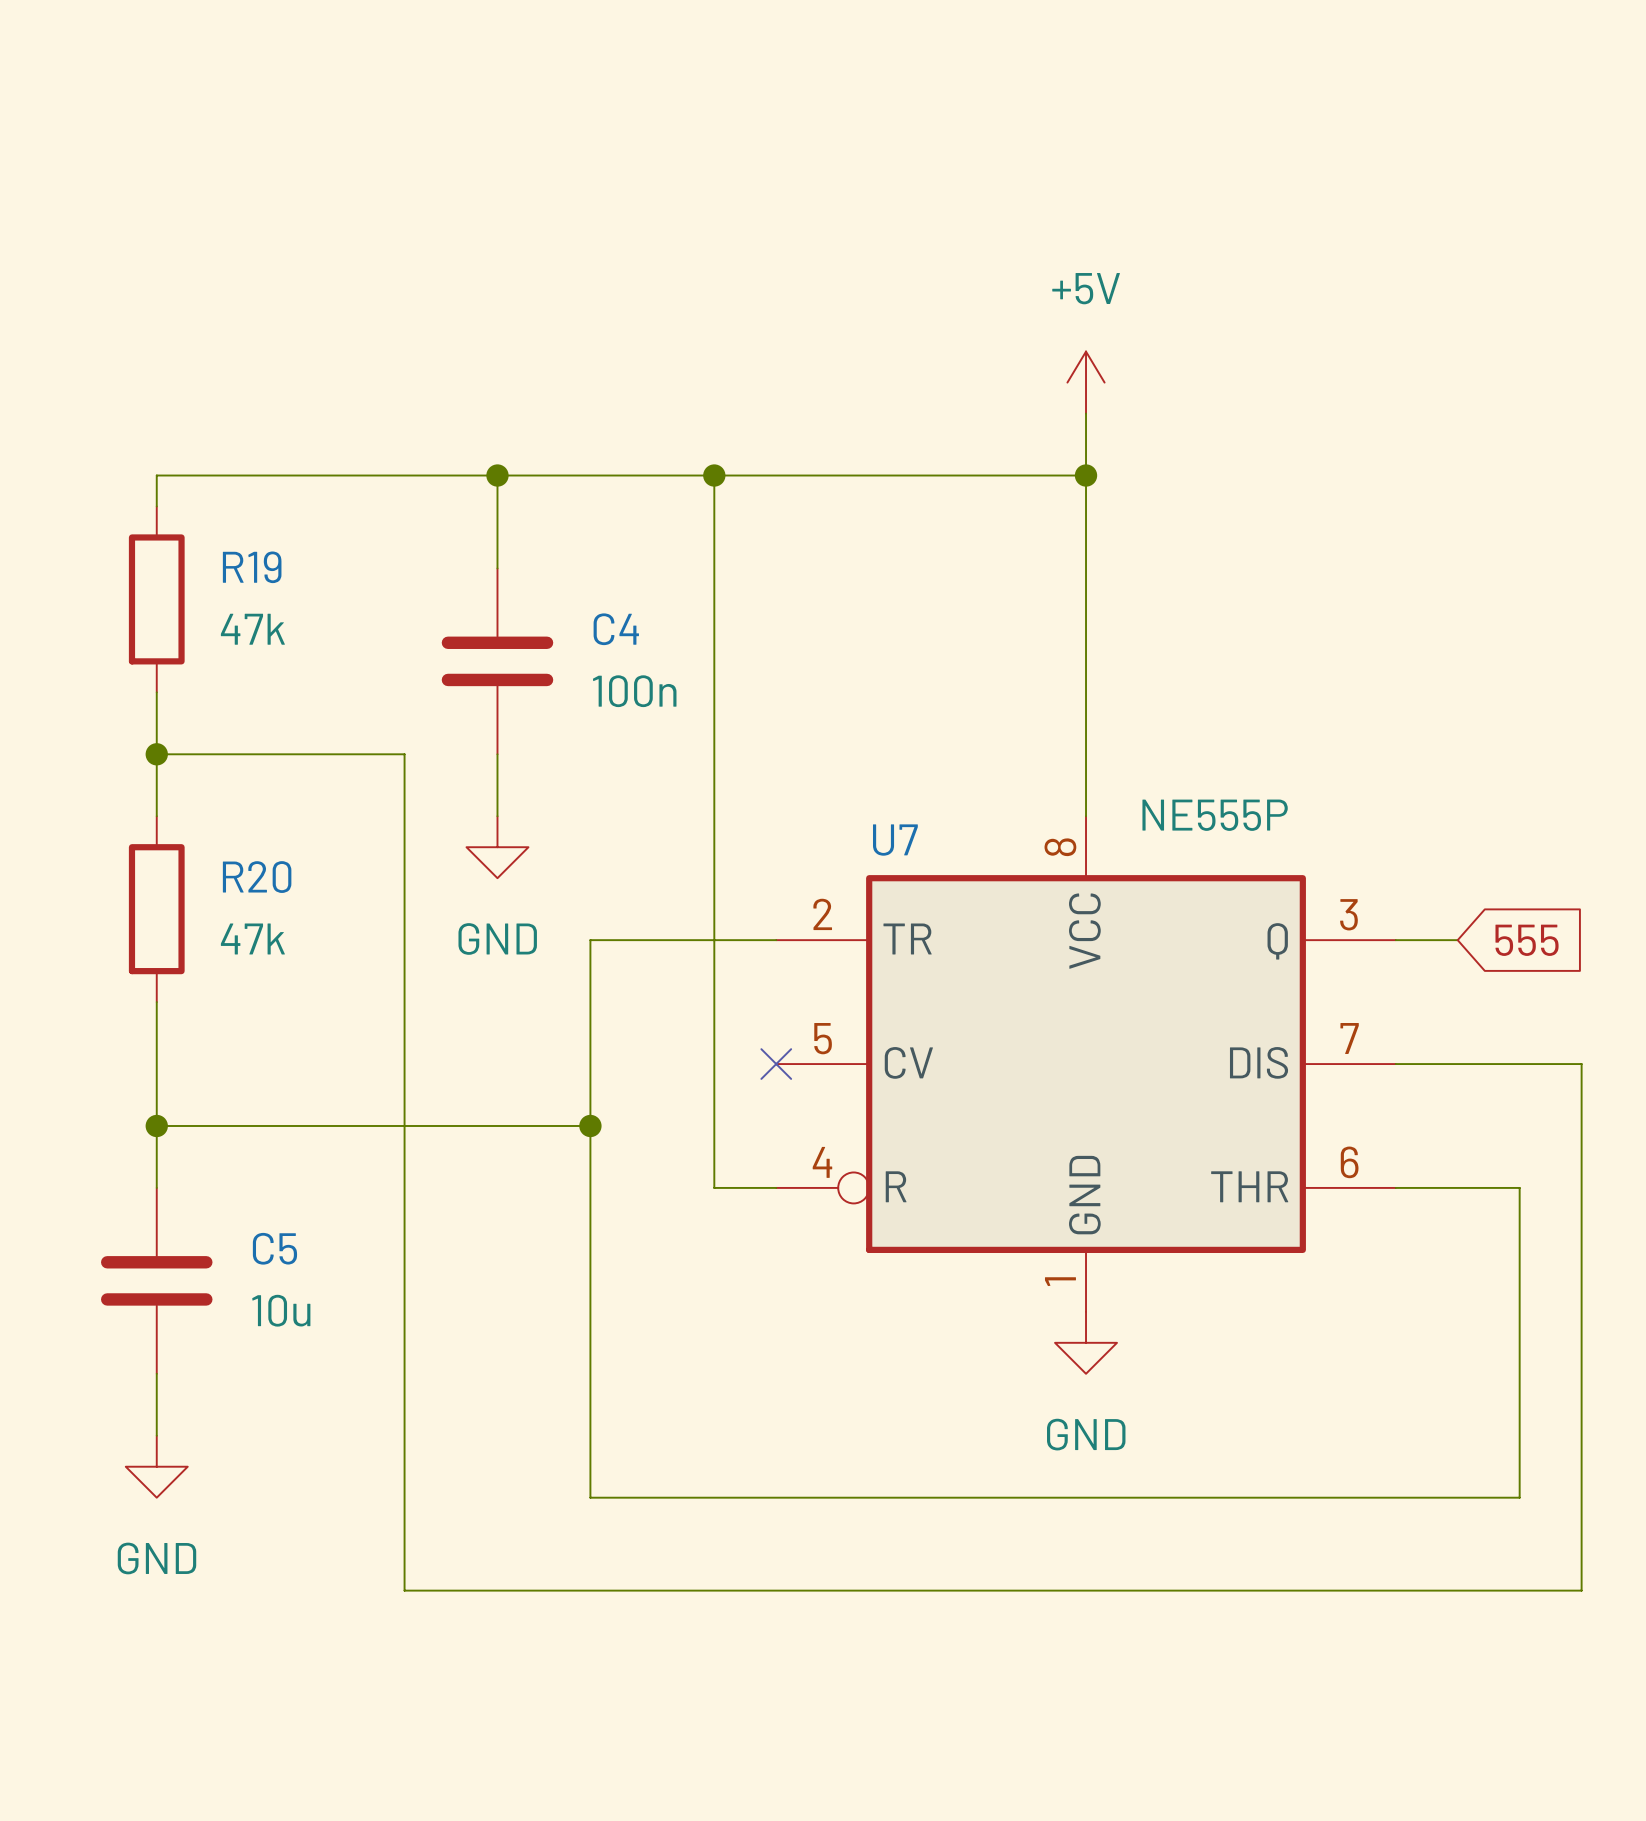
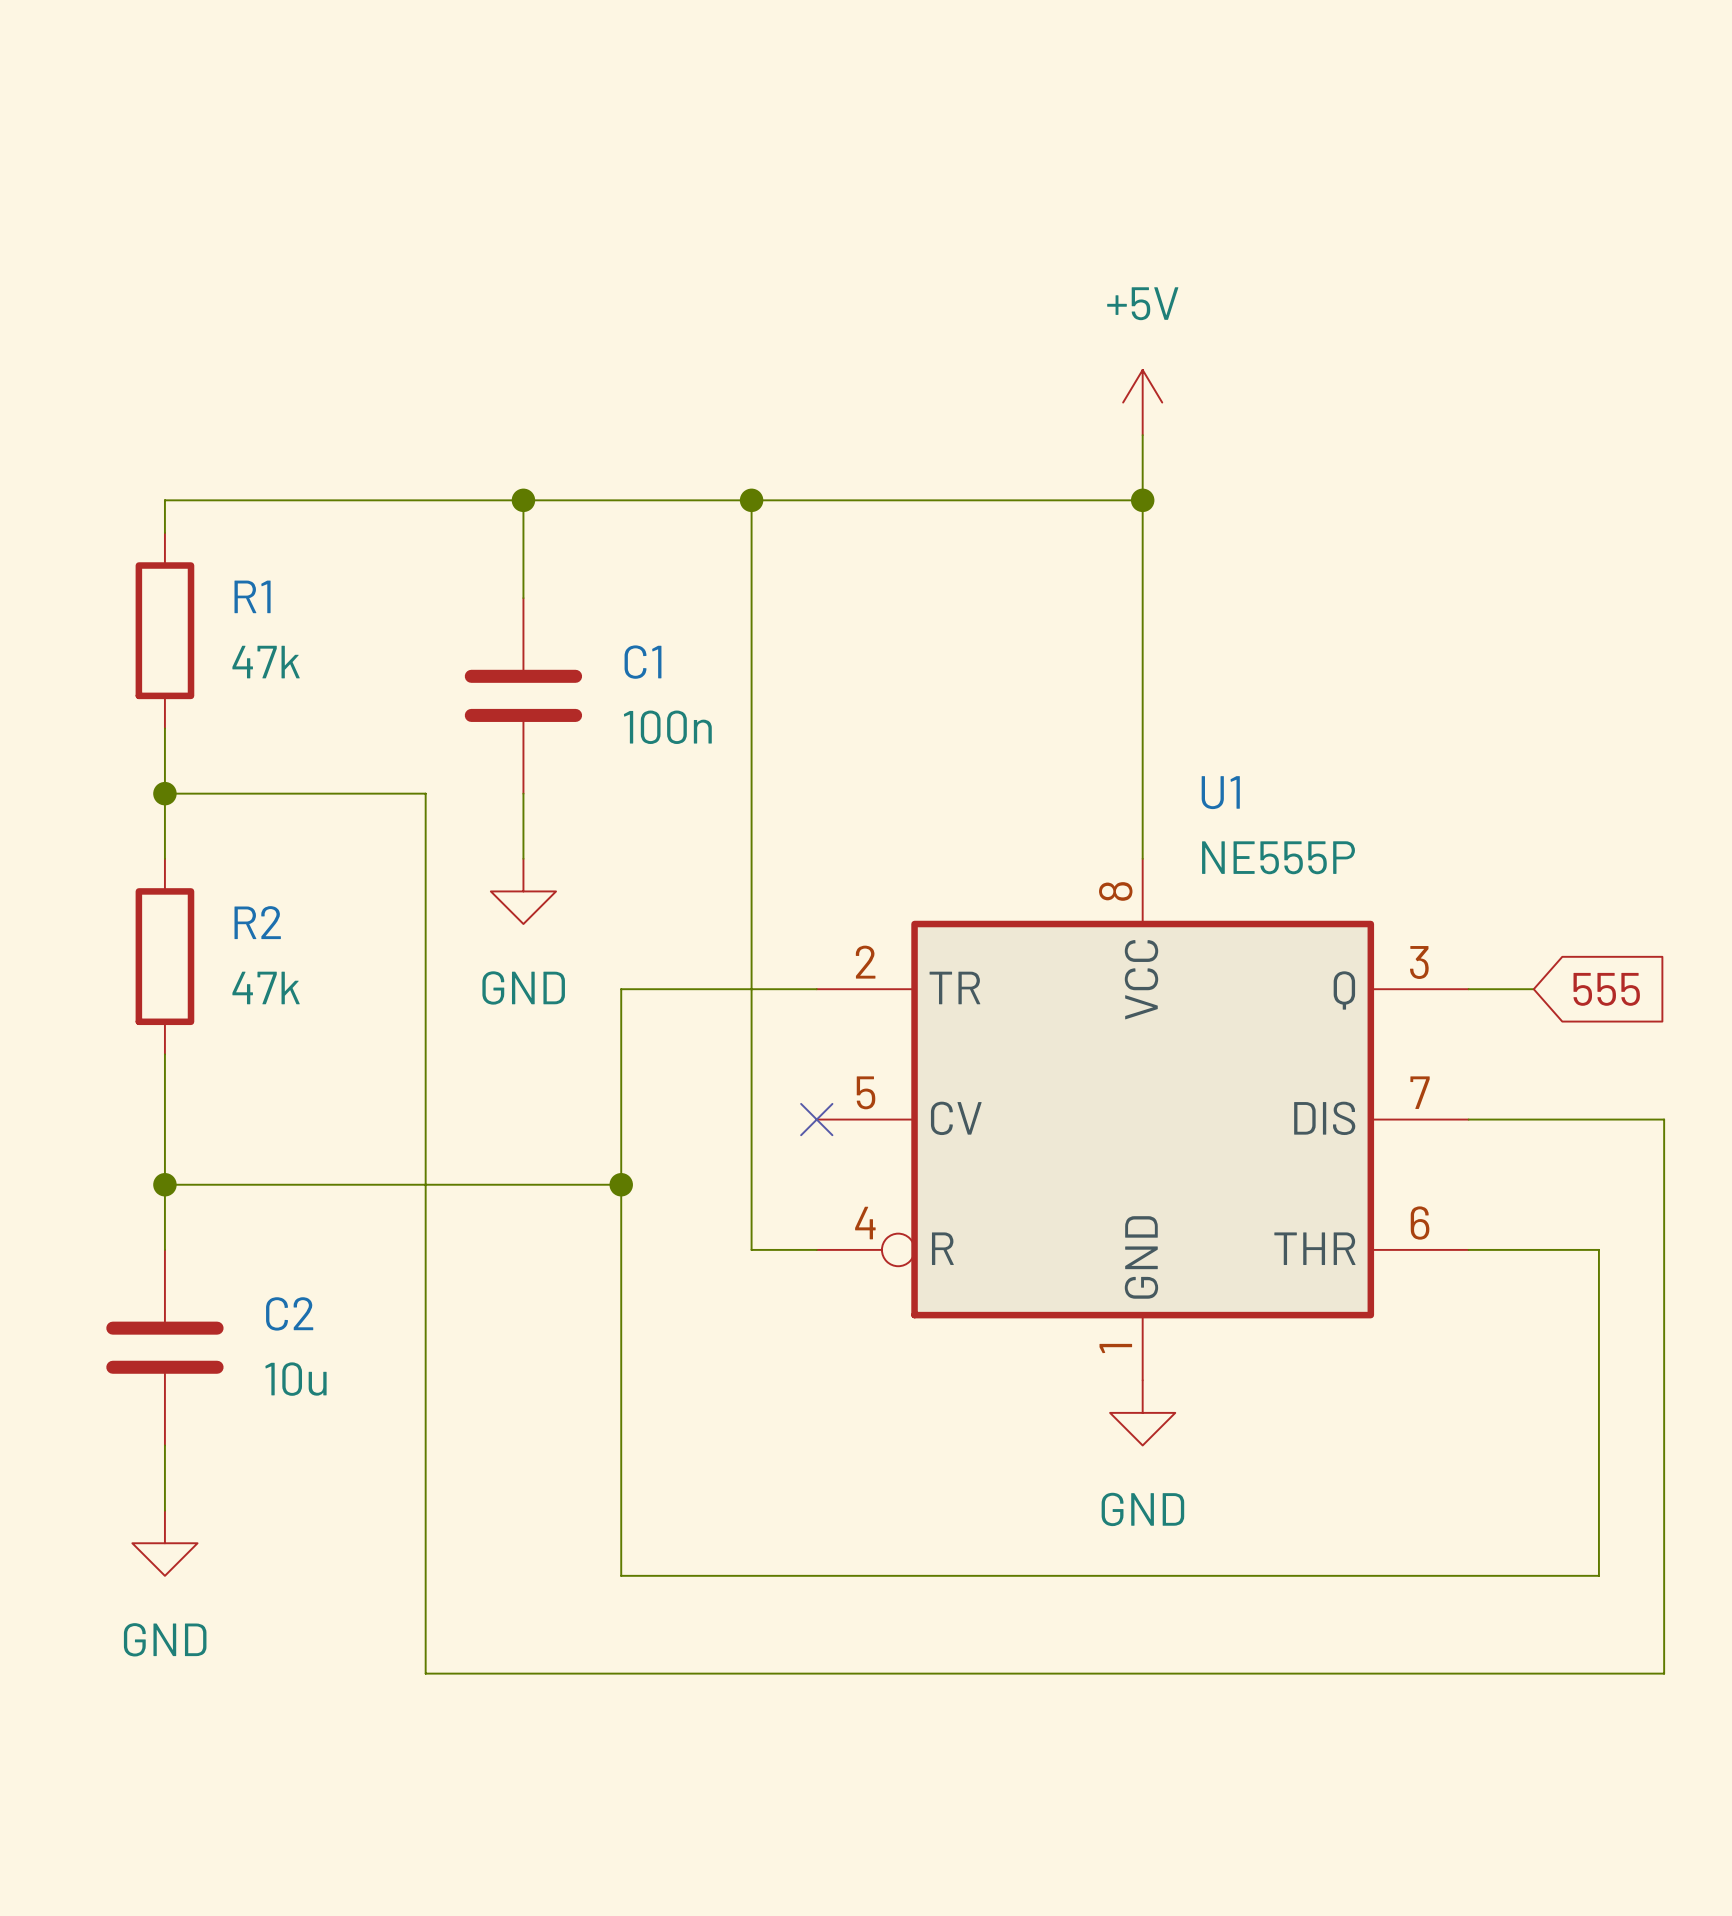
R19 name: R19 (252, 567) -> R1 (252, 596)
C4 name: C4 (616, 629) -> C1 (643, 662)
U7 name: U7 (895, 840) -> U1 (1220, 792)
R20 name: R20 (257, 877) -> R2 (257, 922)
C5 name: C5 (274, 1248) -> C2 (289, 1313)

